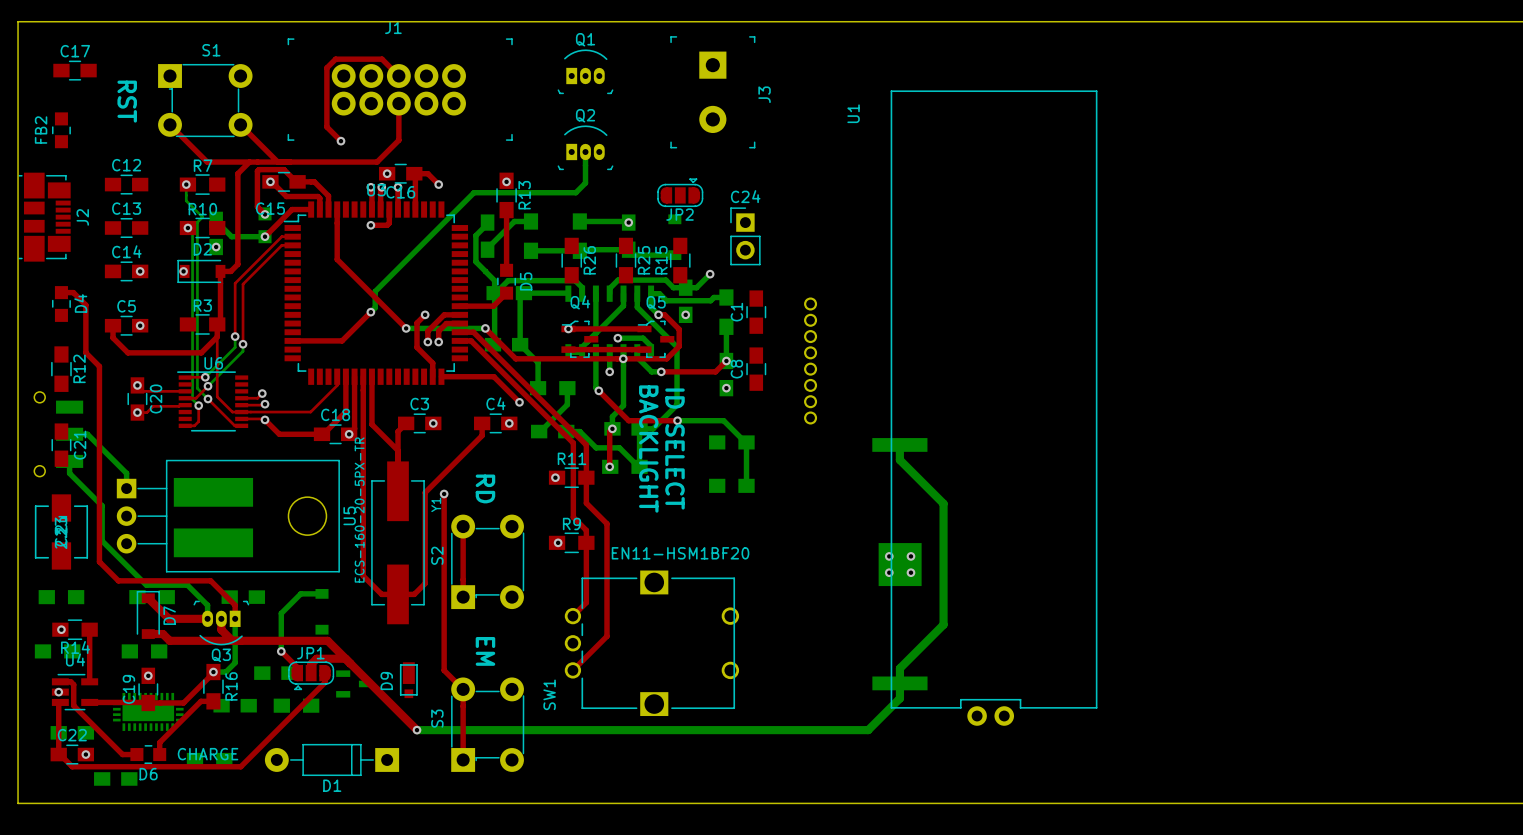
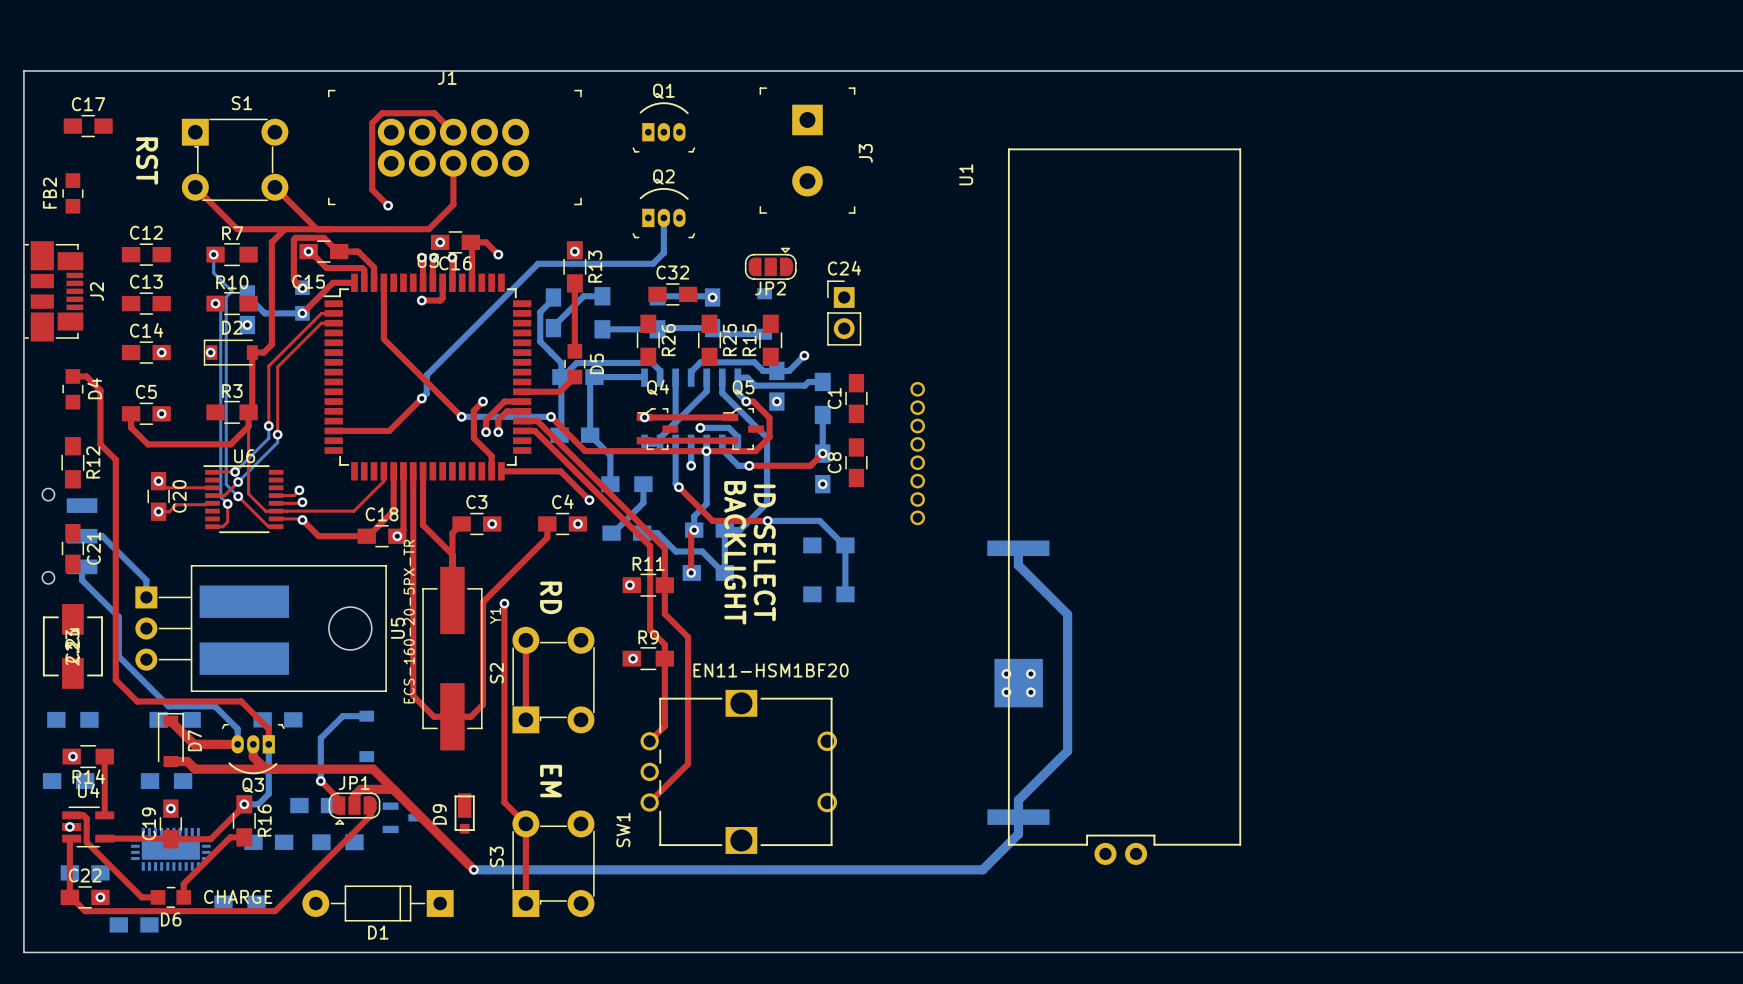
C32: none -> (672, 294)

